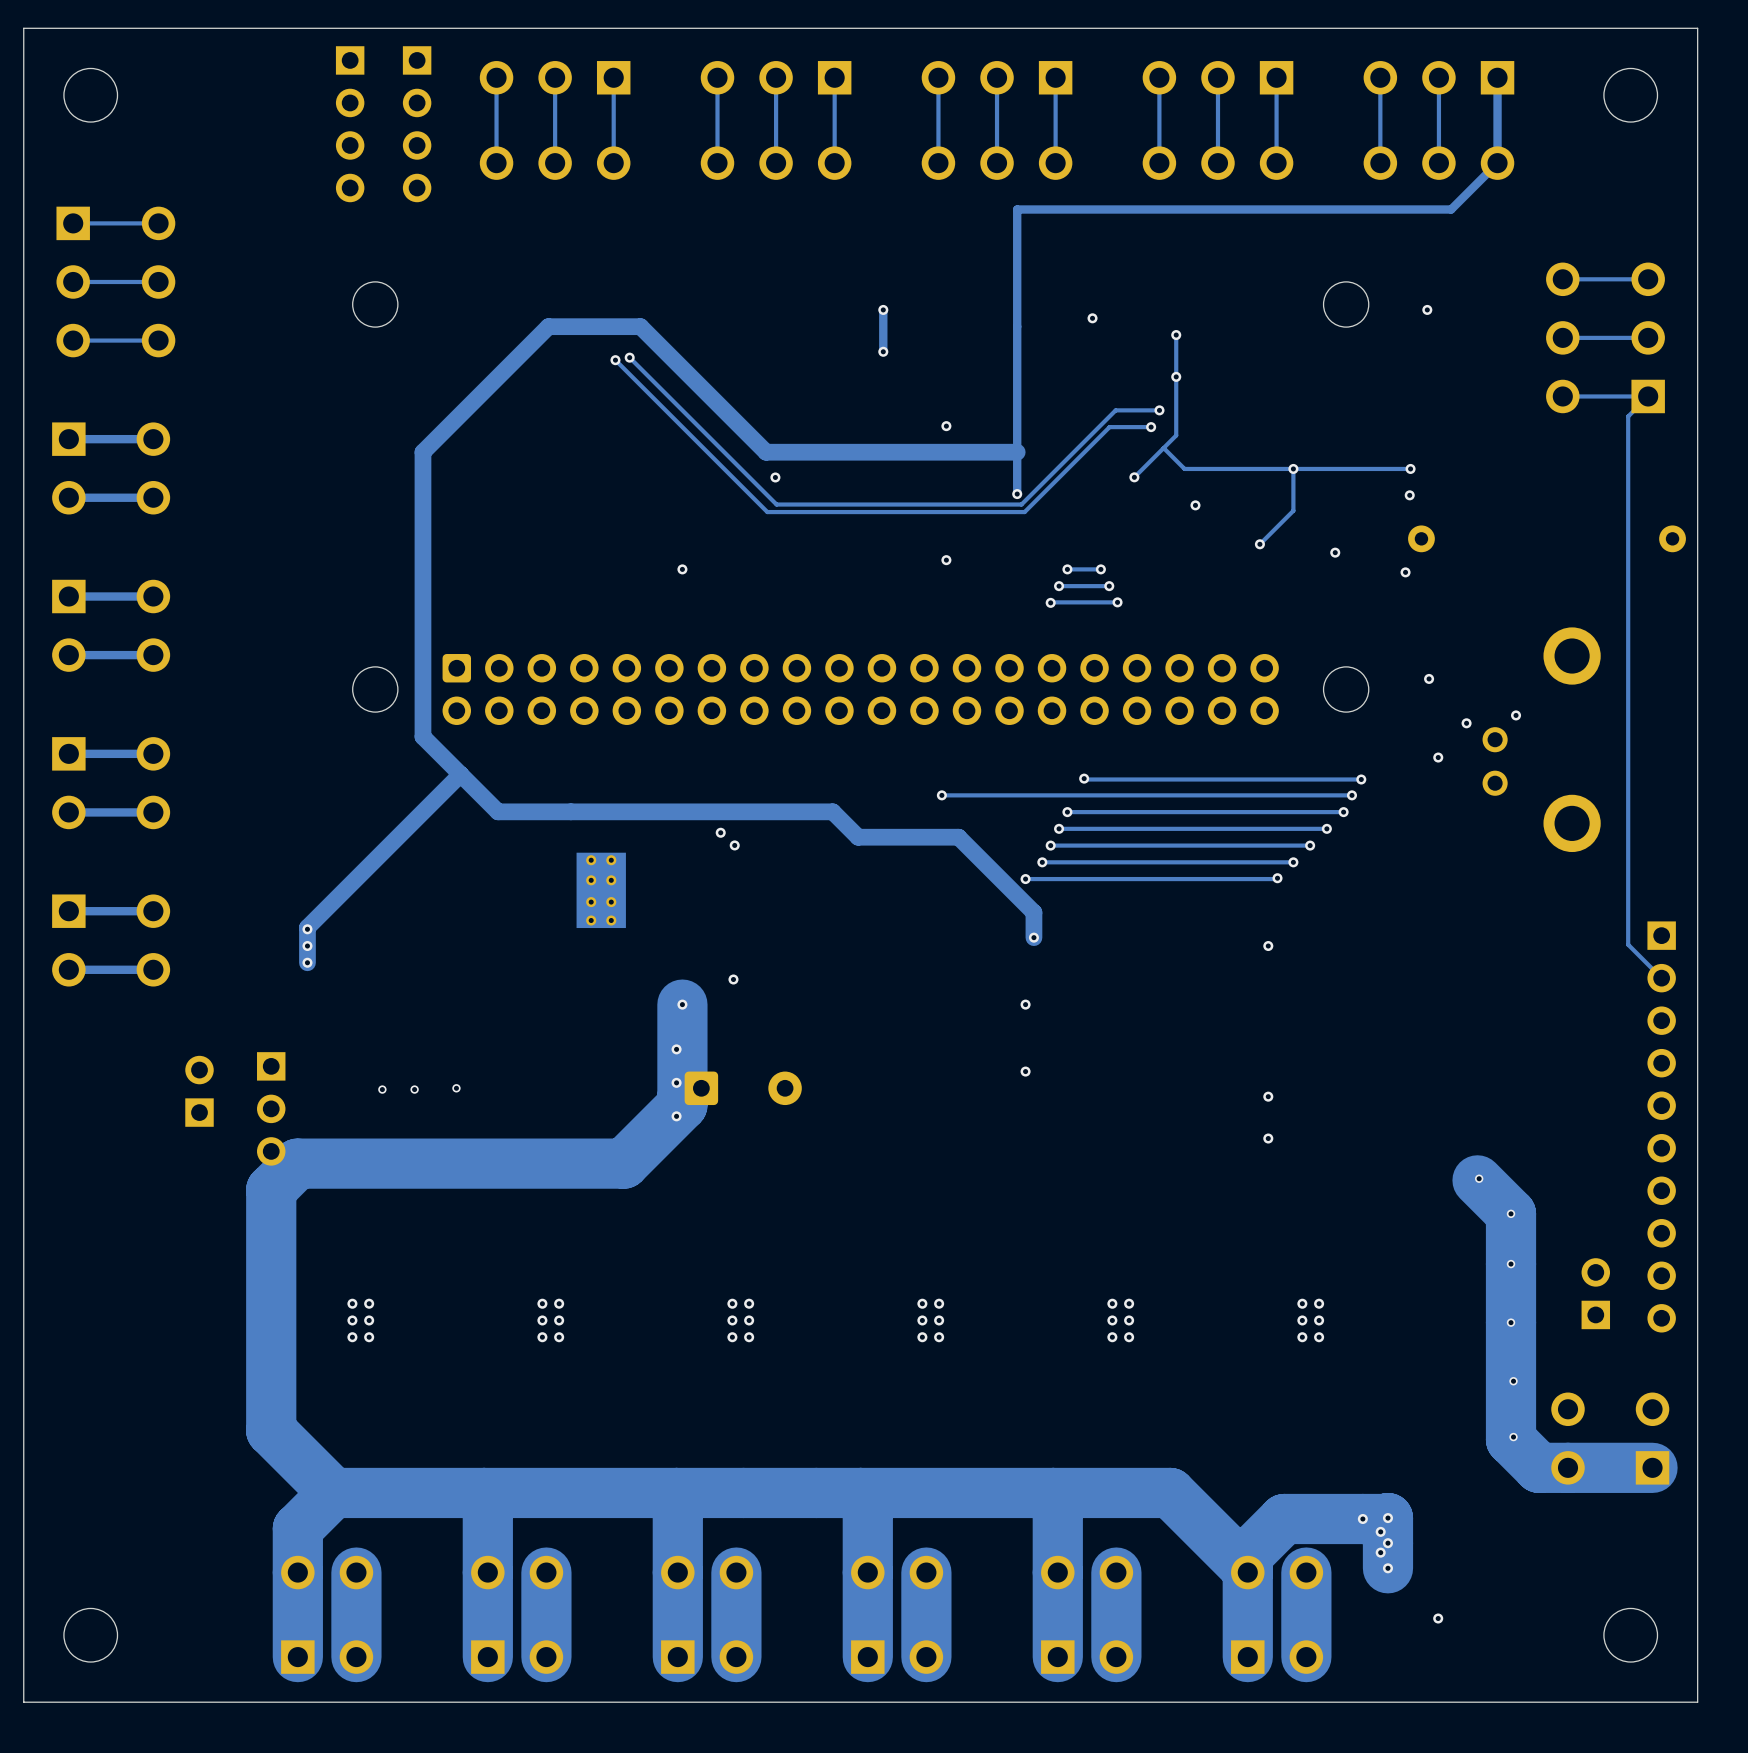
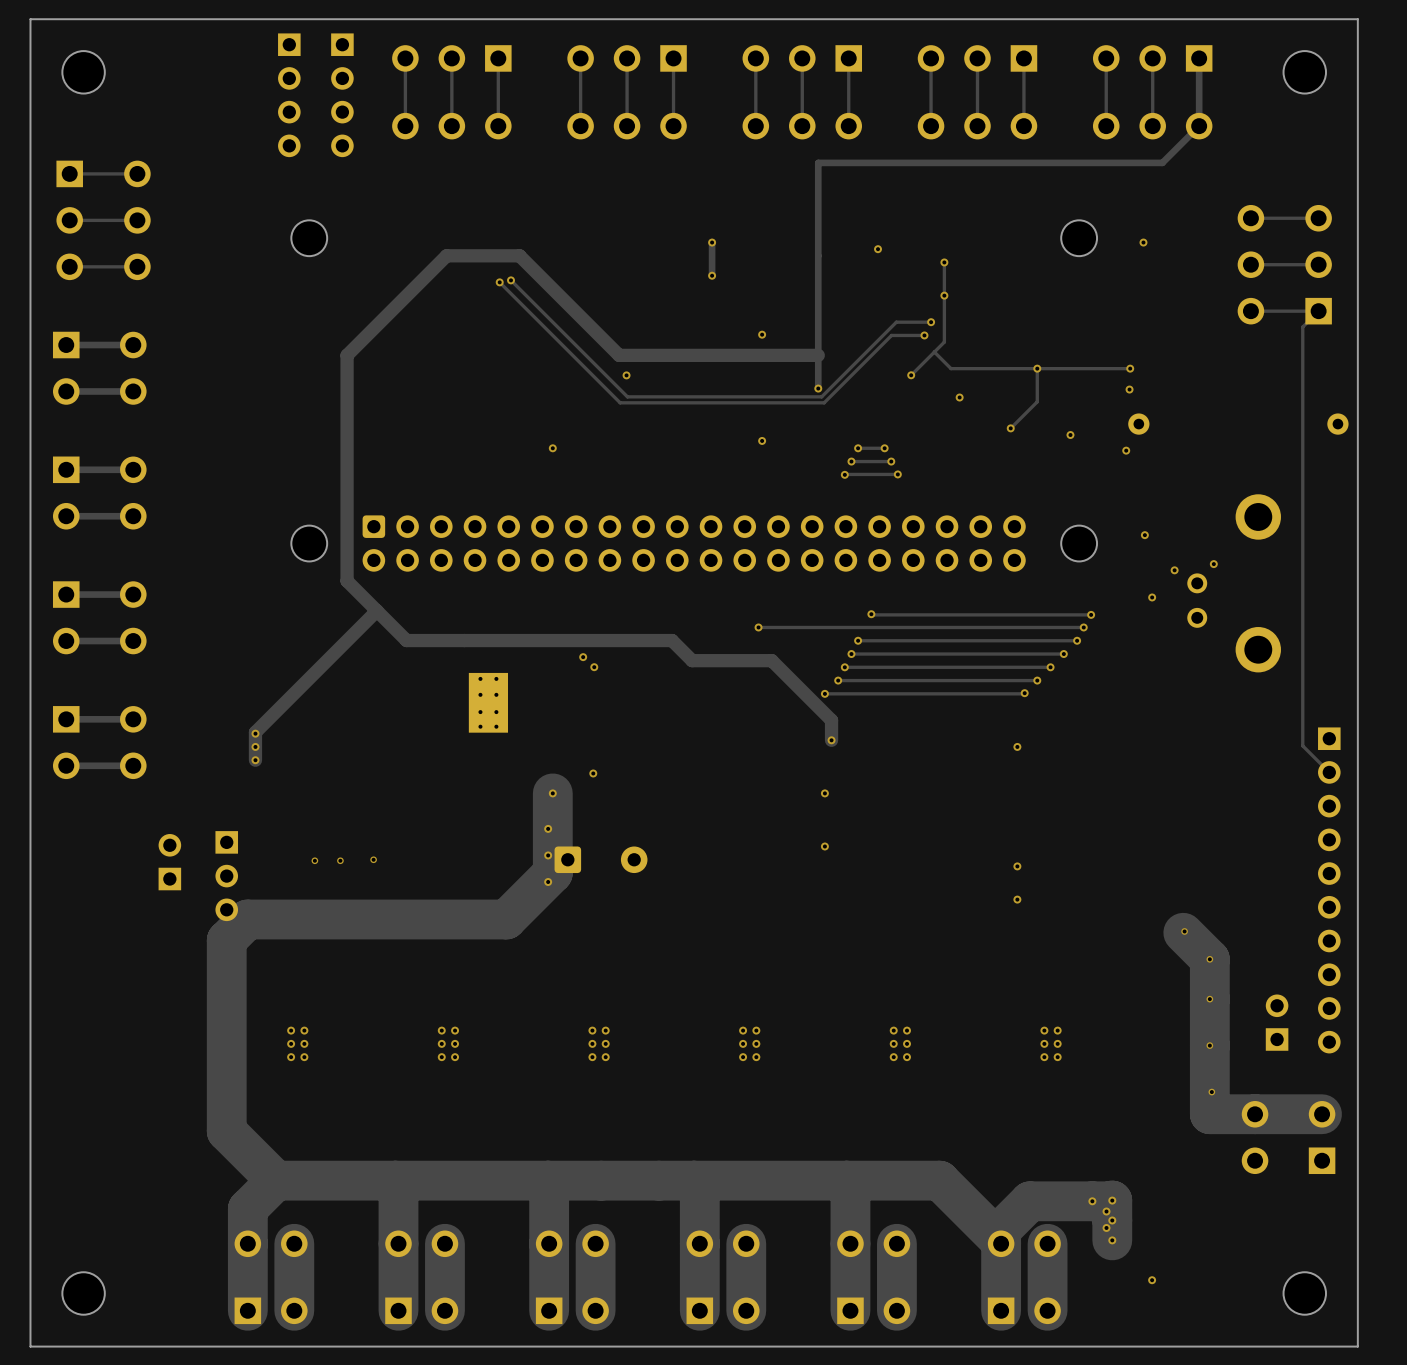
track: (1511, 1409) (1511, 1439) (1539, 1467) (1652, 1467) -> (1209, 1114) (1322, 1114)
via: (1513, 1437) -> none

